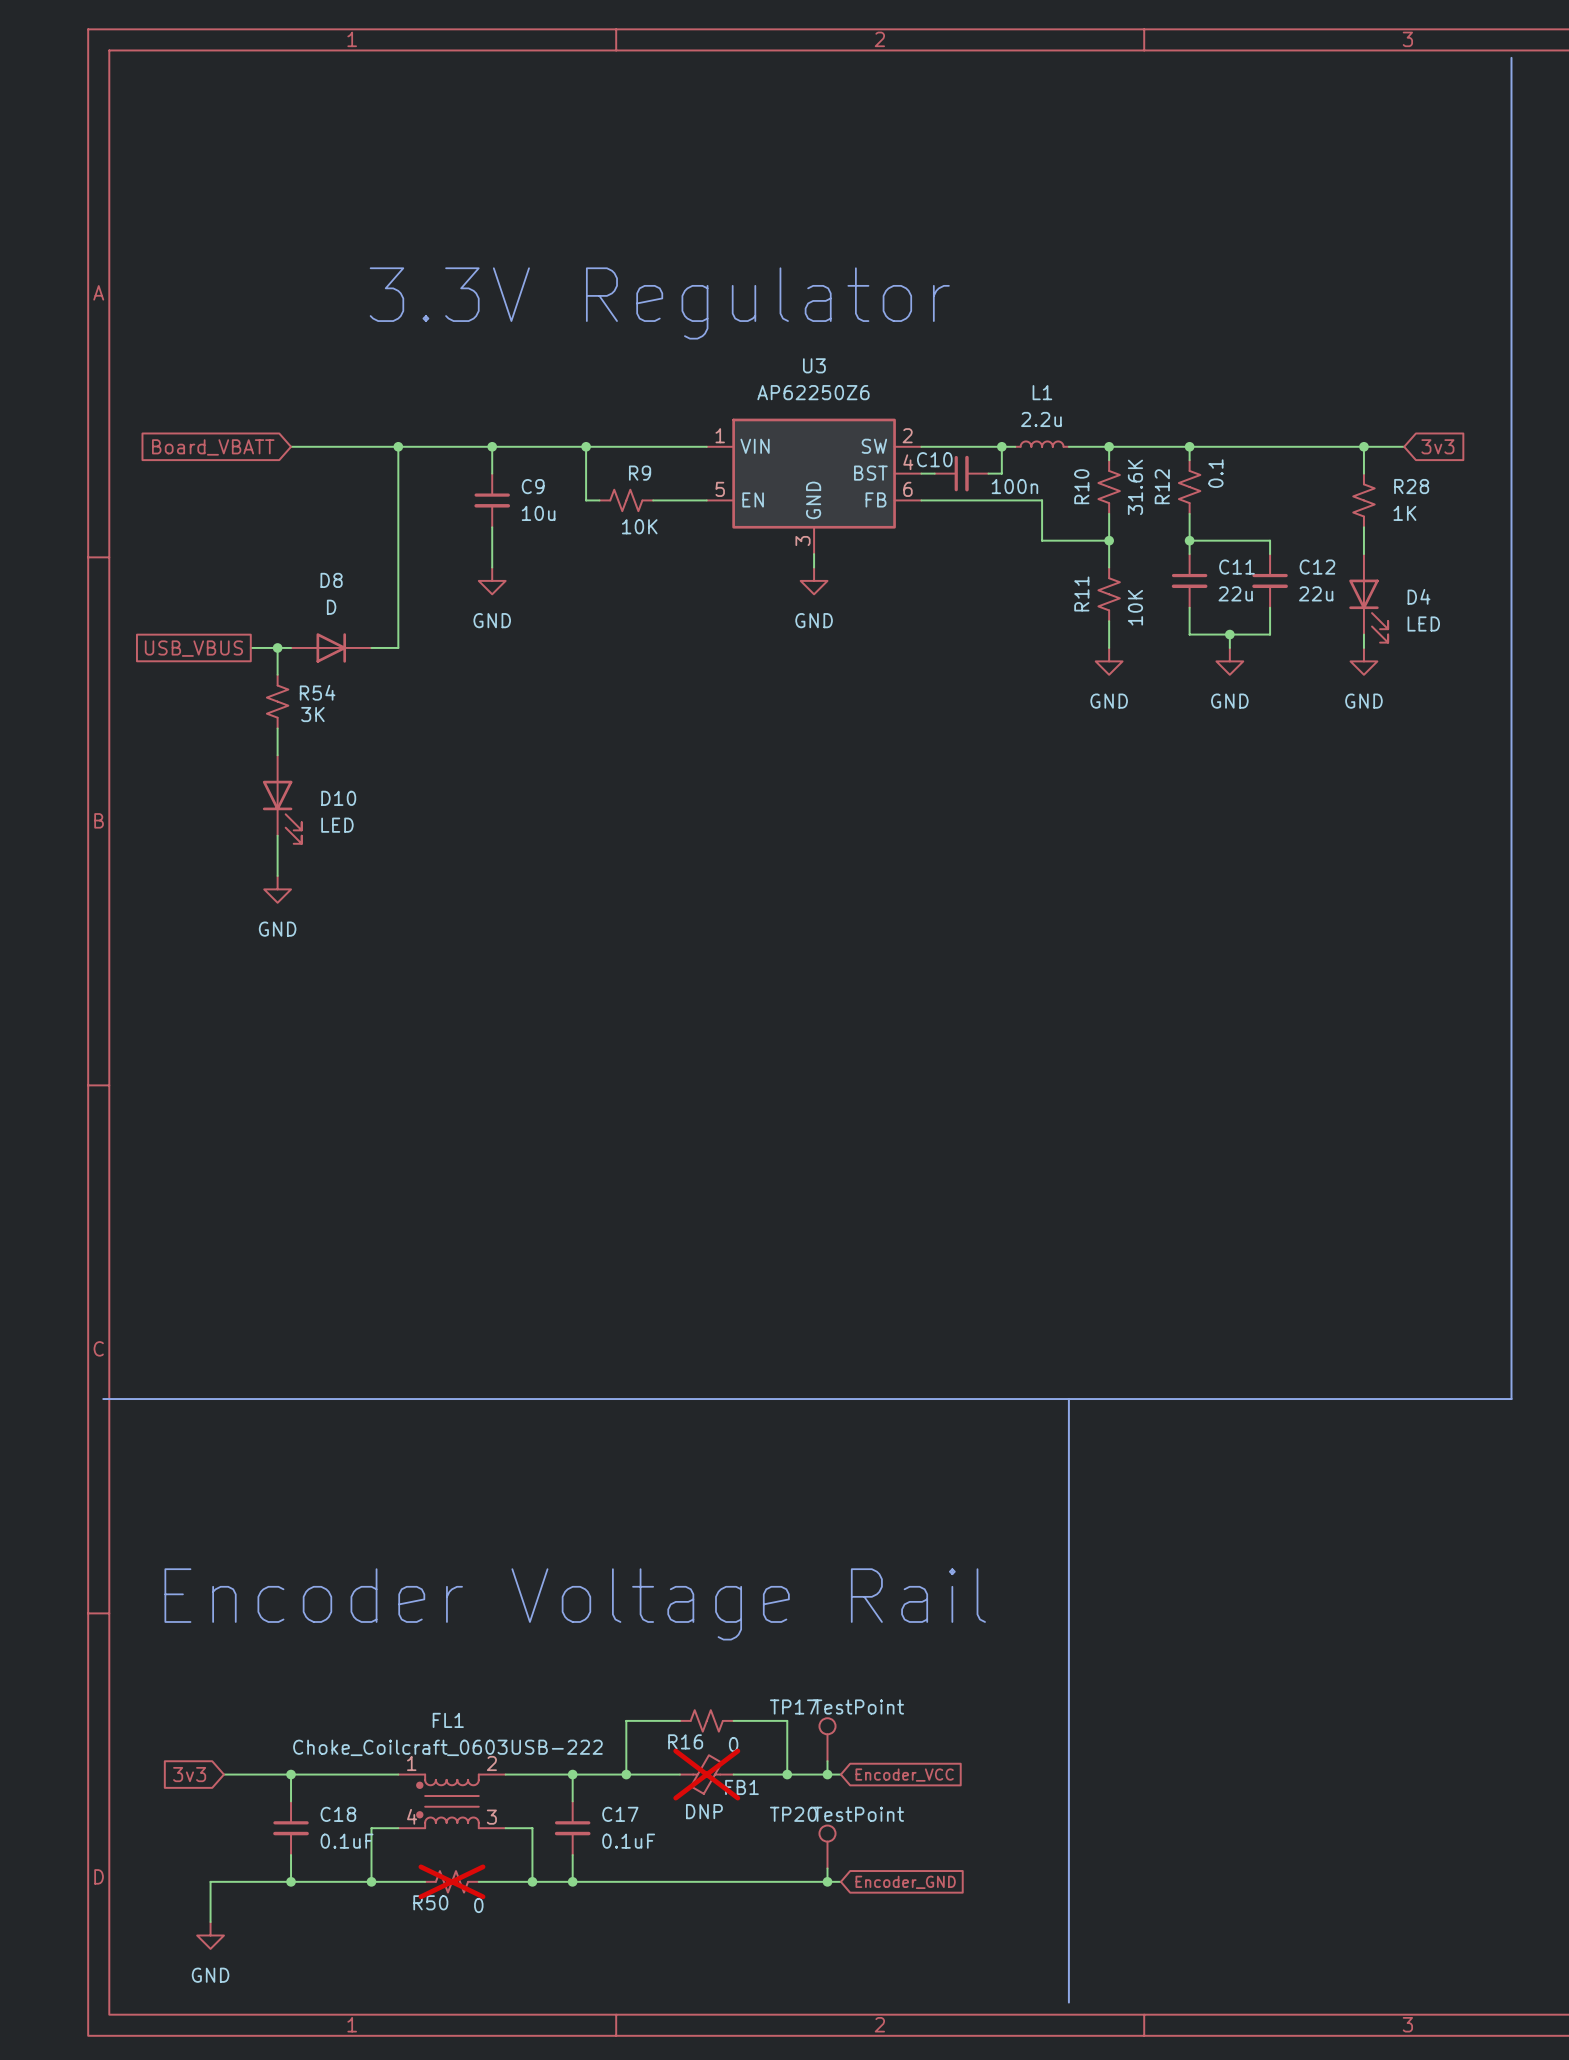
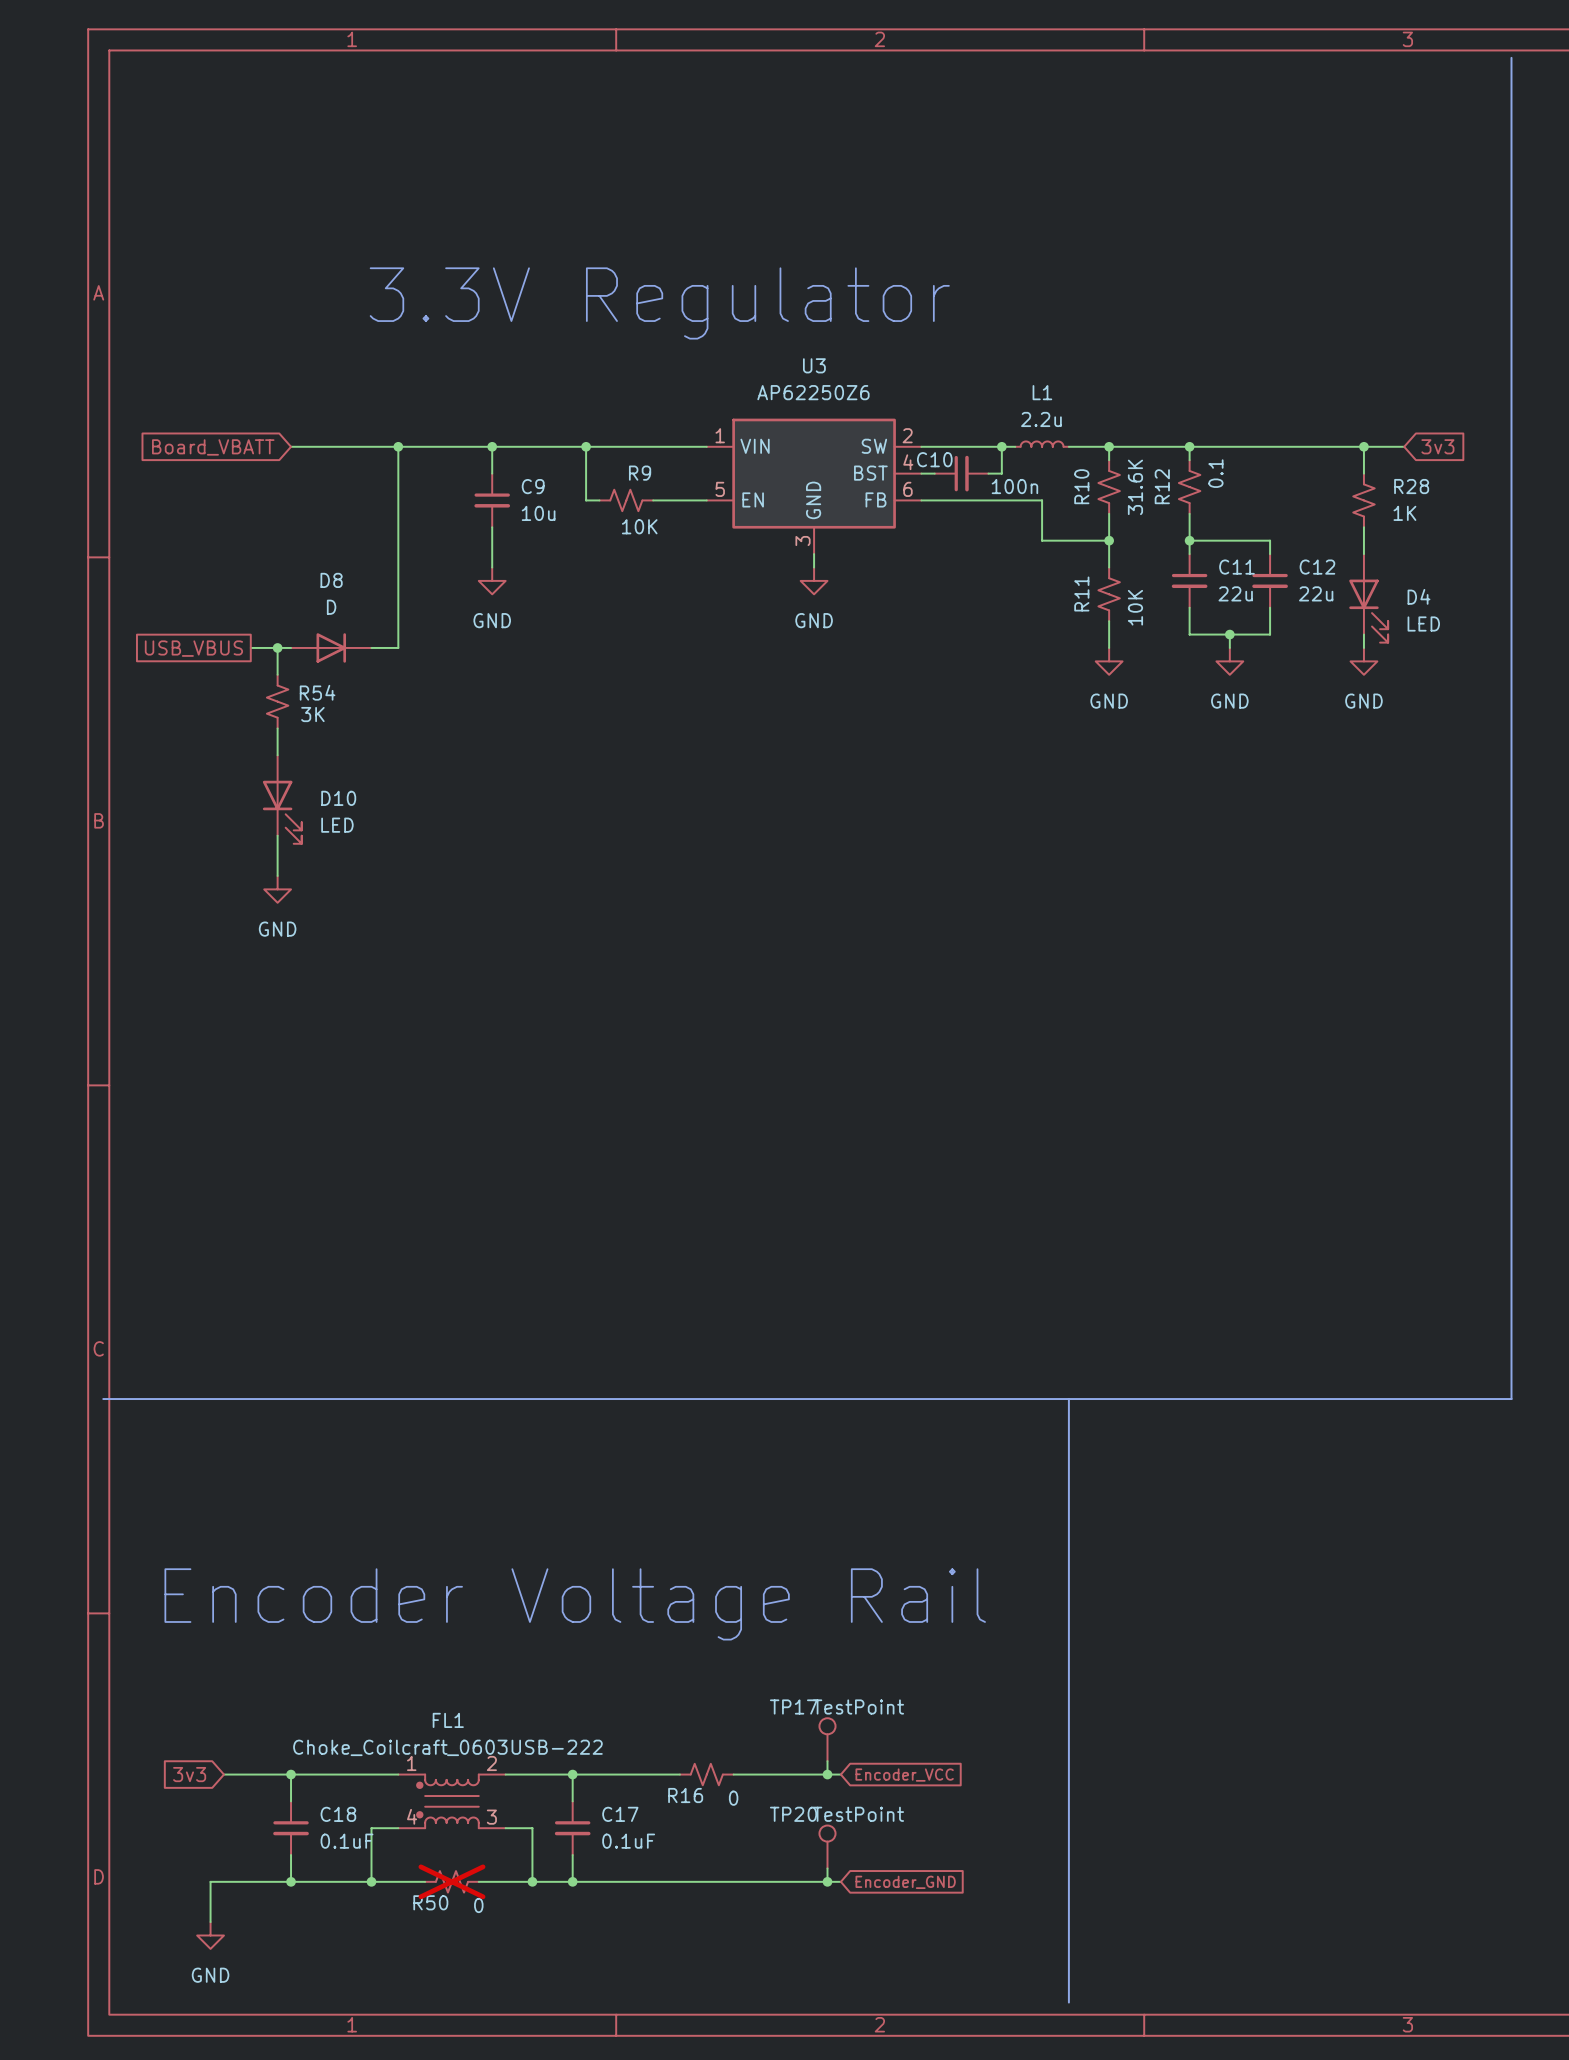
wire: (679, 1720) (626, 1720) (626, 1774) -> none
R16 position: (706, 1720) -> (706, 1774)
wire: (733, 1720) (787, 1720) (787, 1774) -> none
junction: (626, 1774) -> none
FB1: DNP (706, 1774) -> none
junction: (787, 1774) -> none

